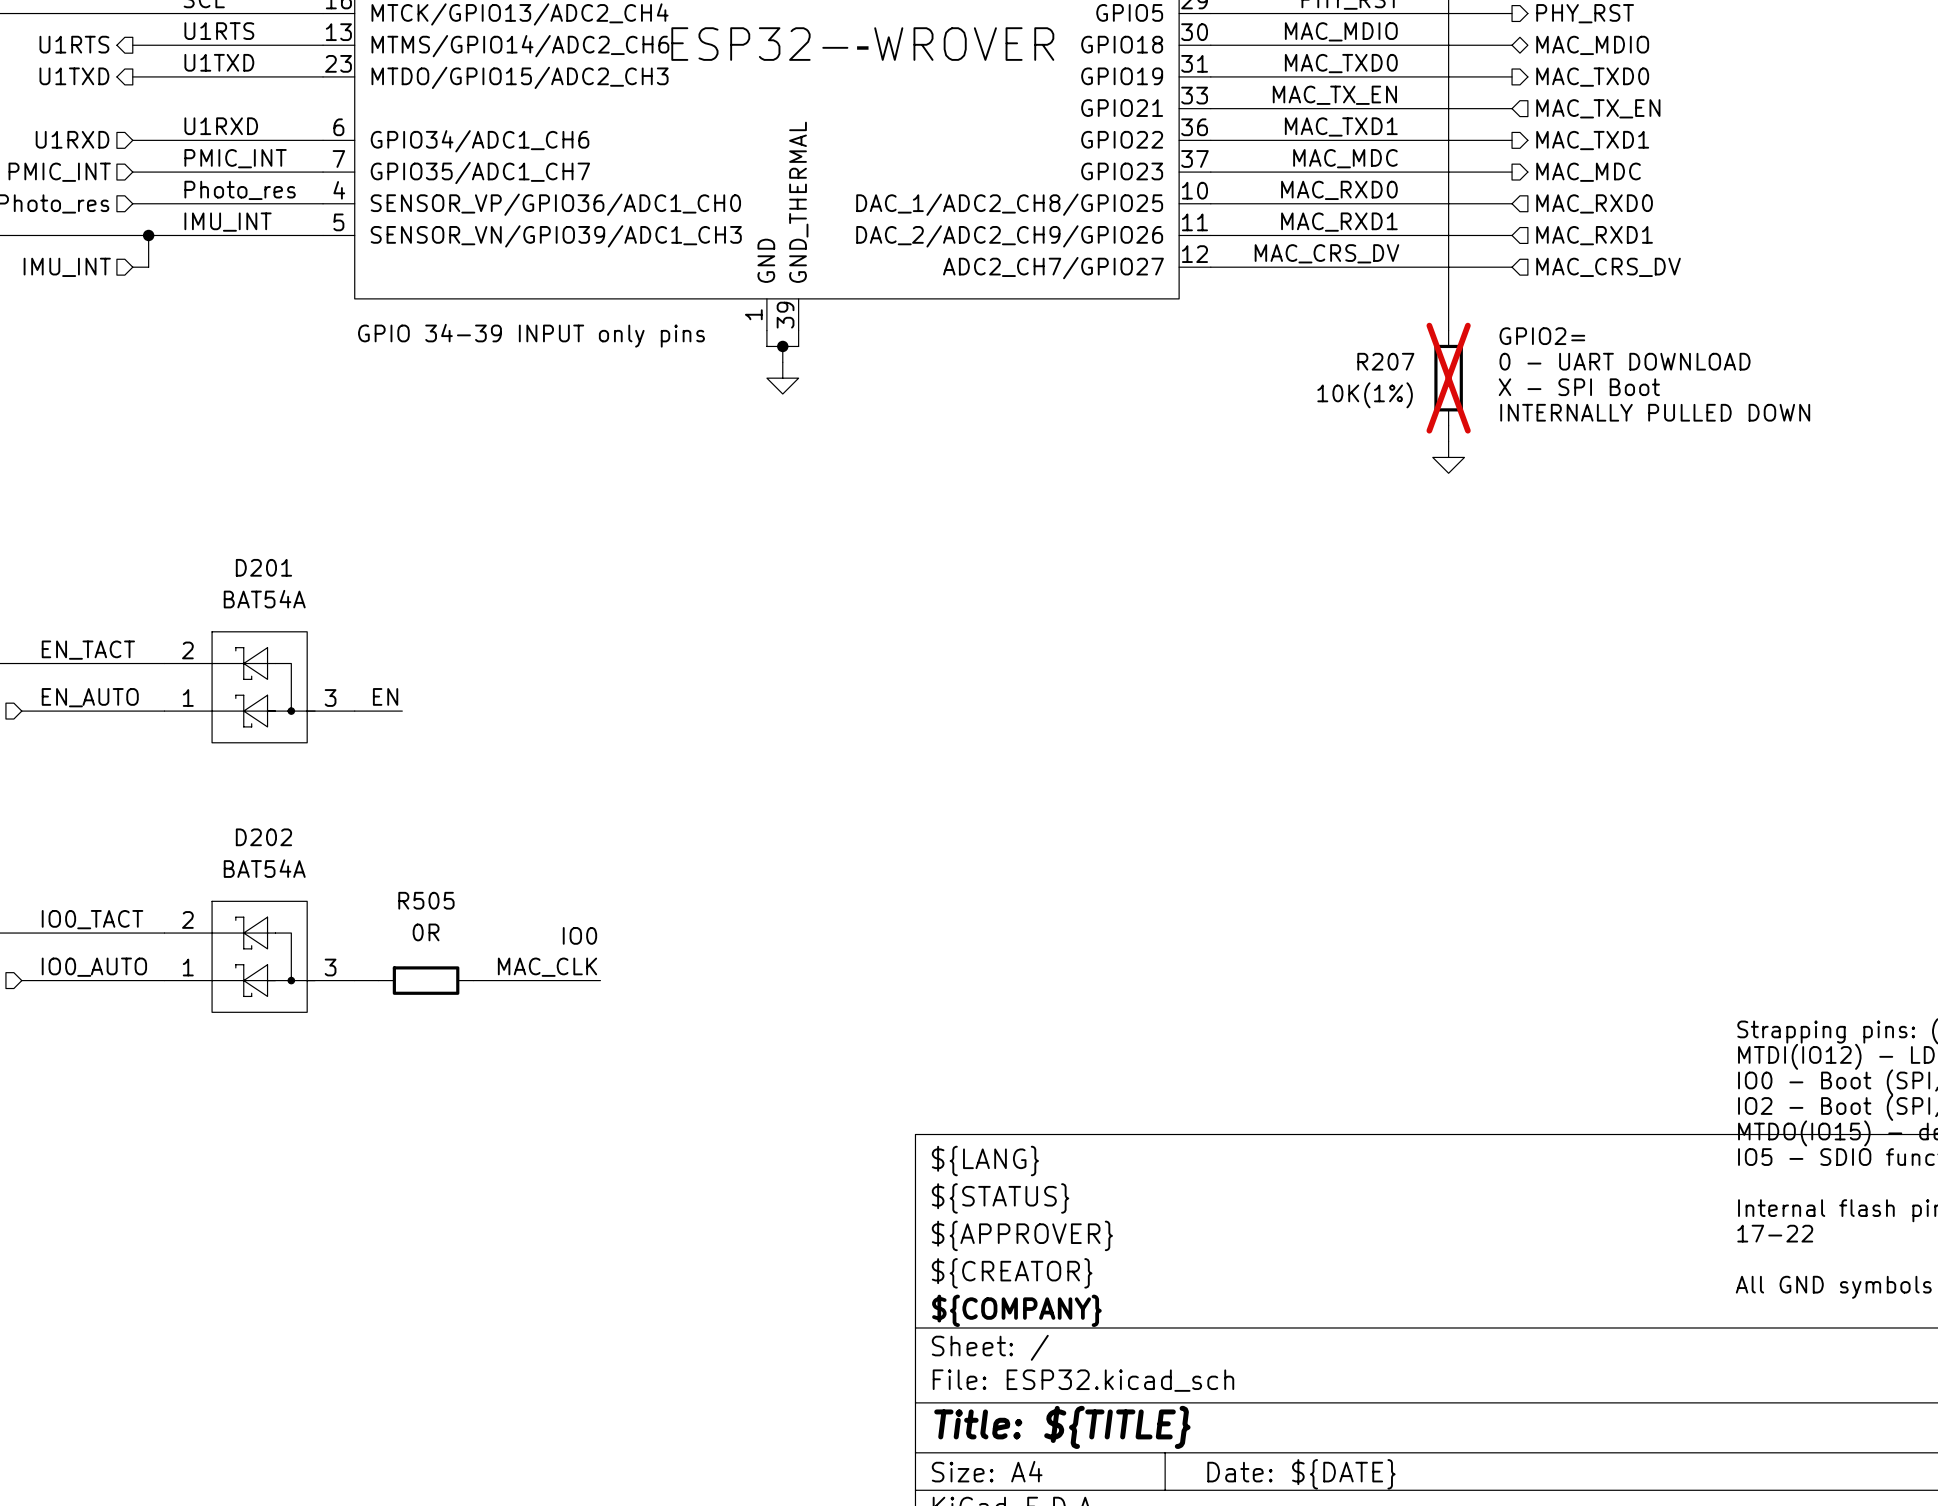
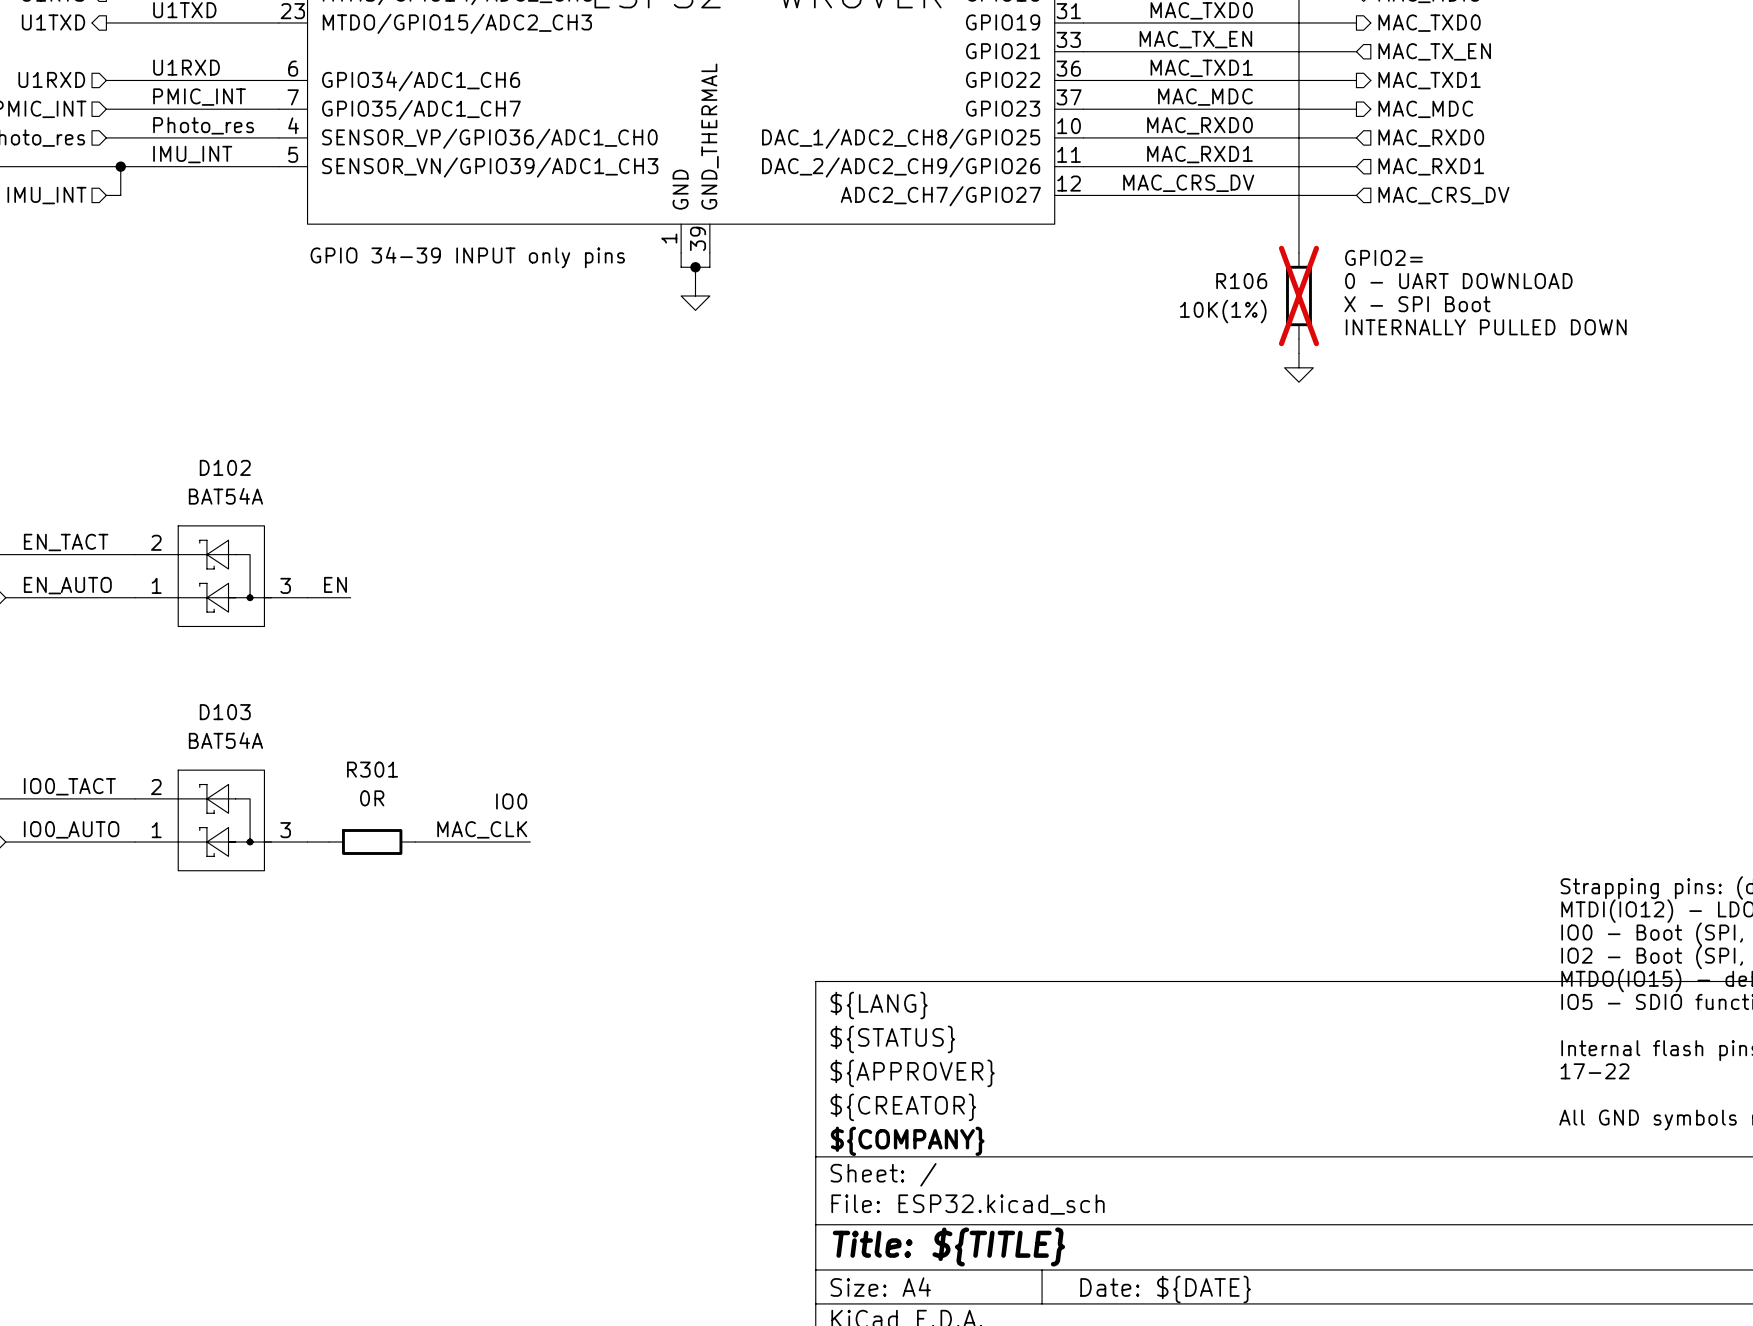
R207 name: R207 (1385, 361) -> R106 (1241, 281)
D201 name: D201 (263, 567) -> D102 (225, 467)
D202 name: D202 (263, 837) -> D103 (225, 712)
R505 name: R505 (426, 900) -> R301 (372, 769)

